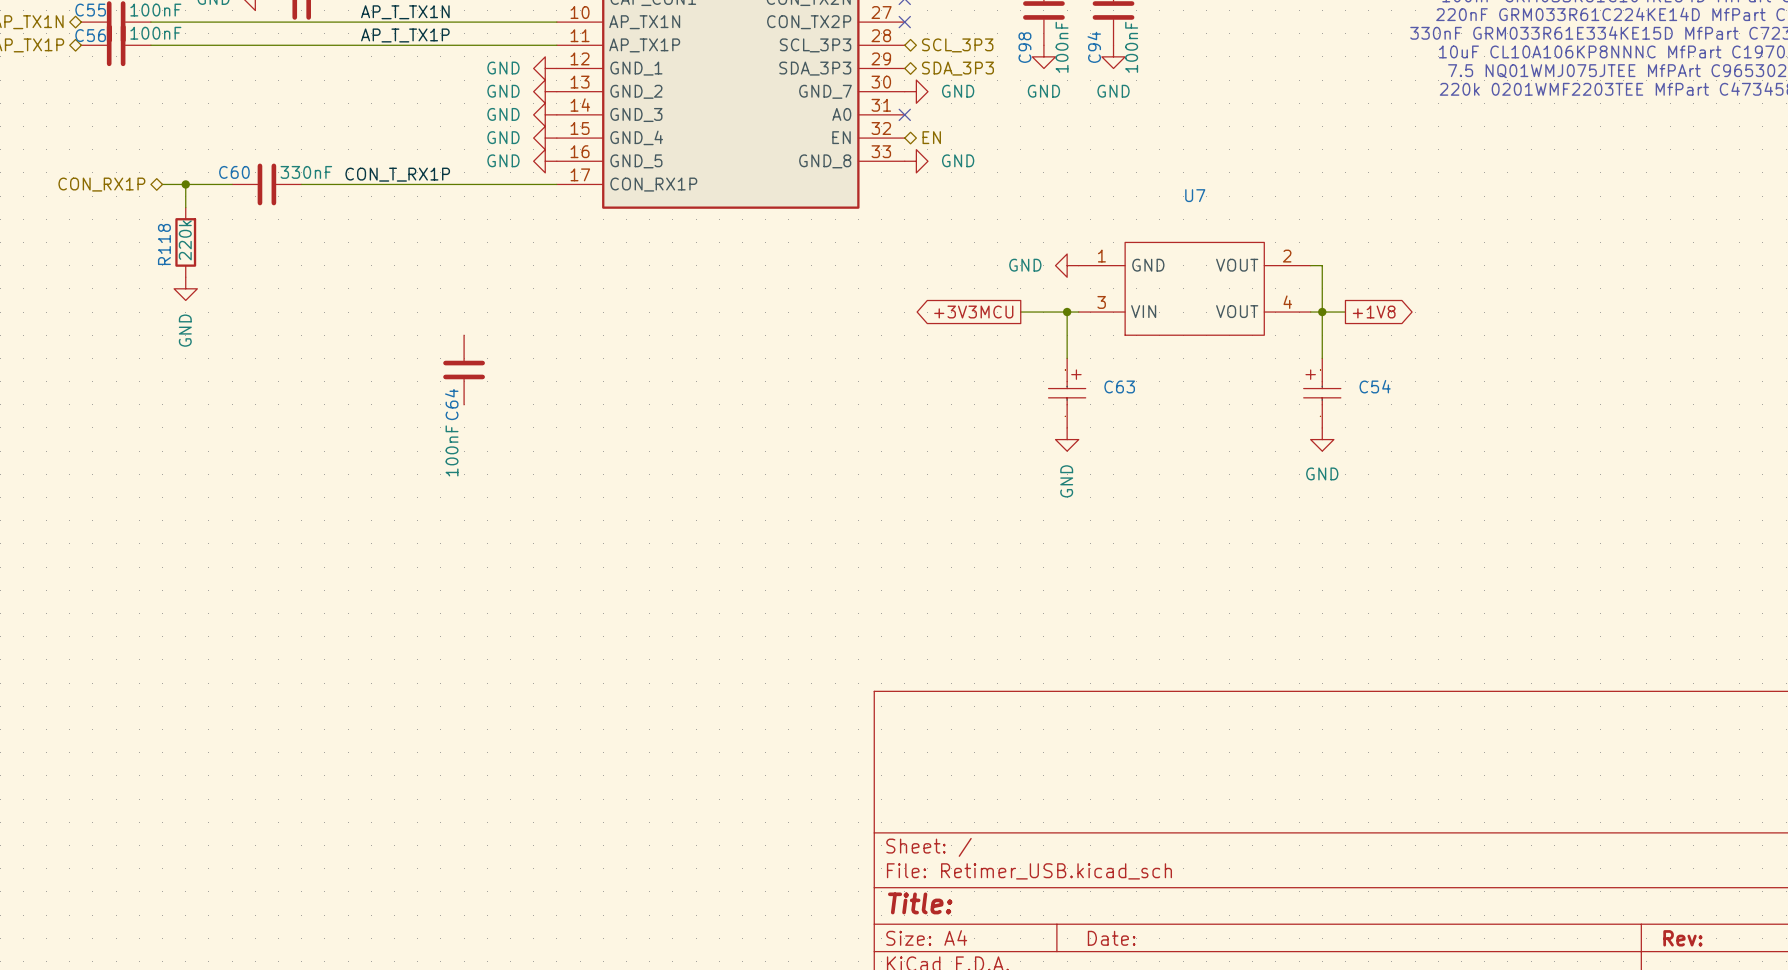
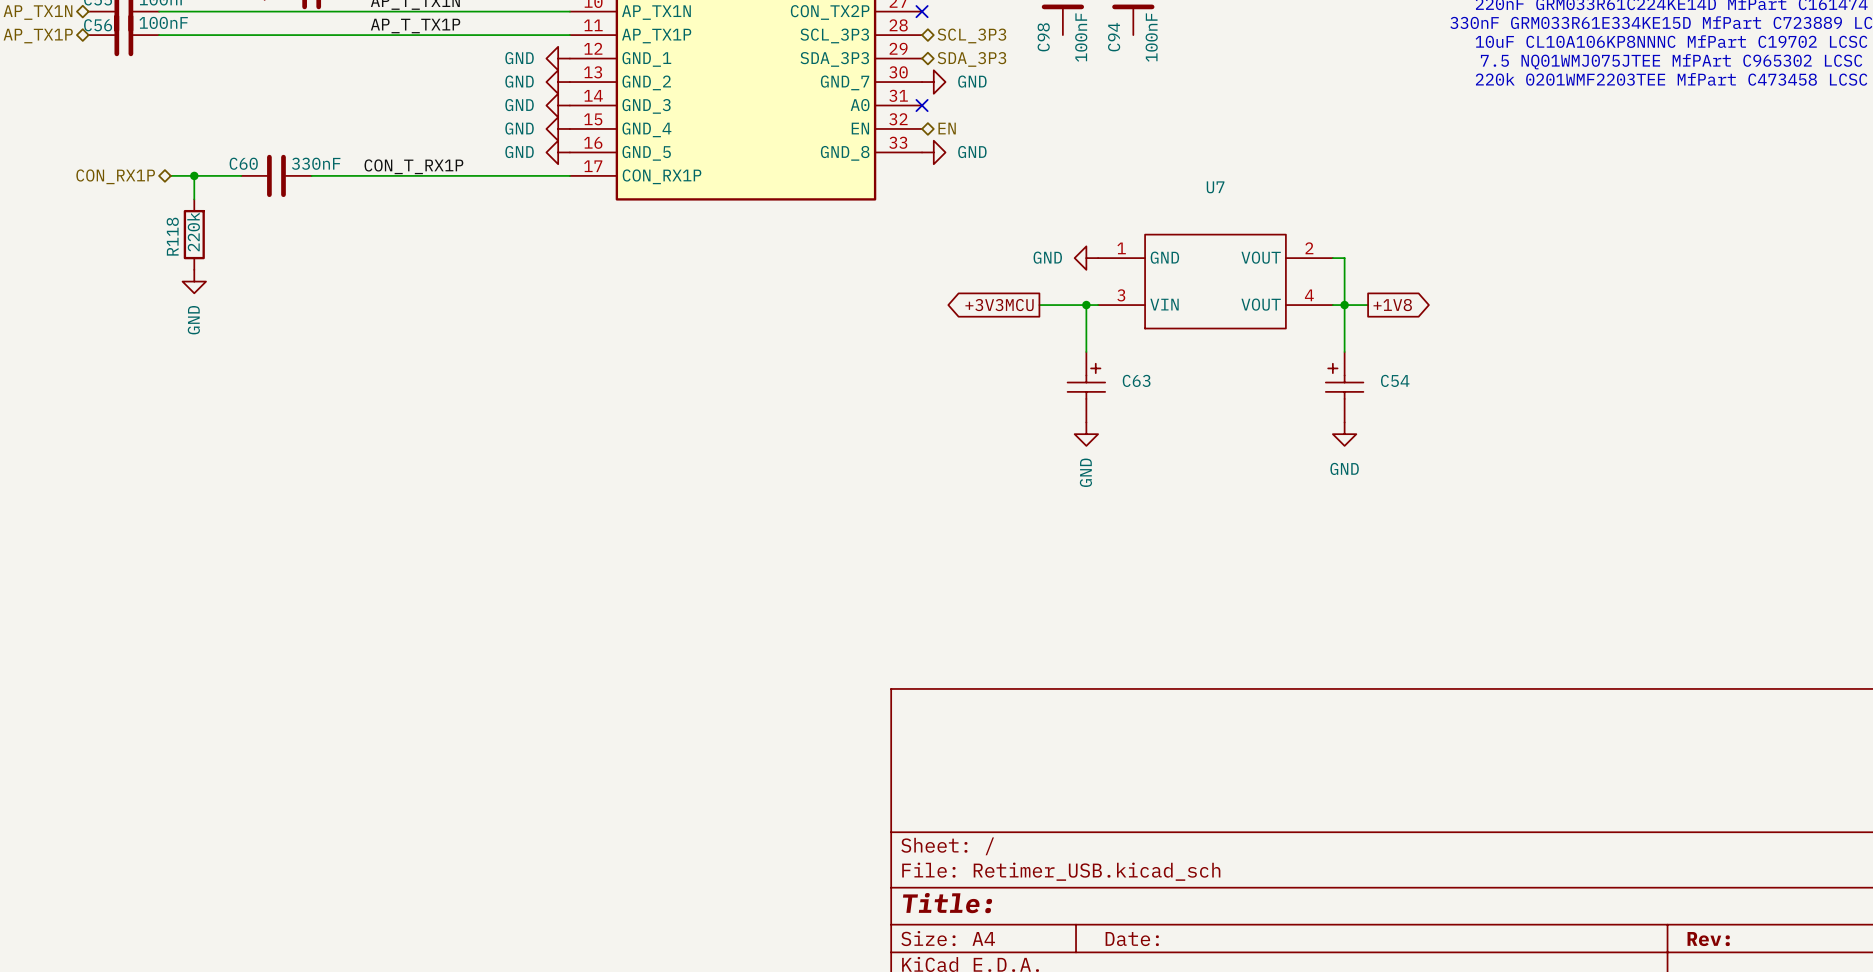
power symbol: GND (1043, 56) -> none
power symbol: GND (1113, 56) -> none
C64: 100nF (464, 370) -> none

